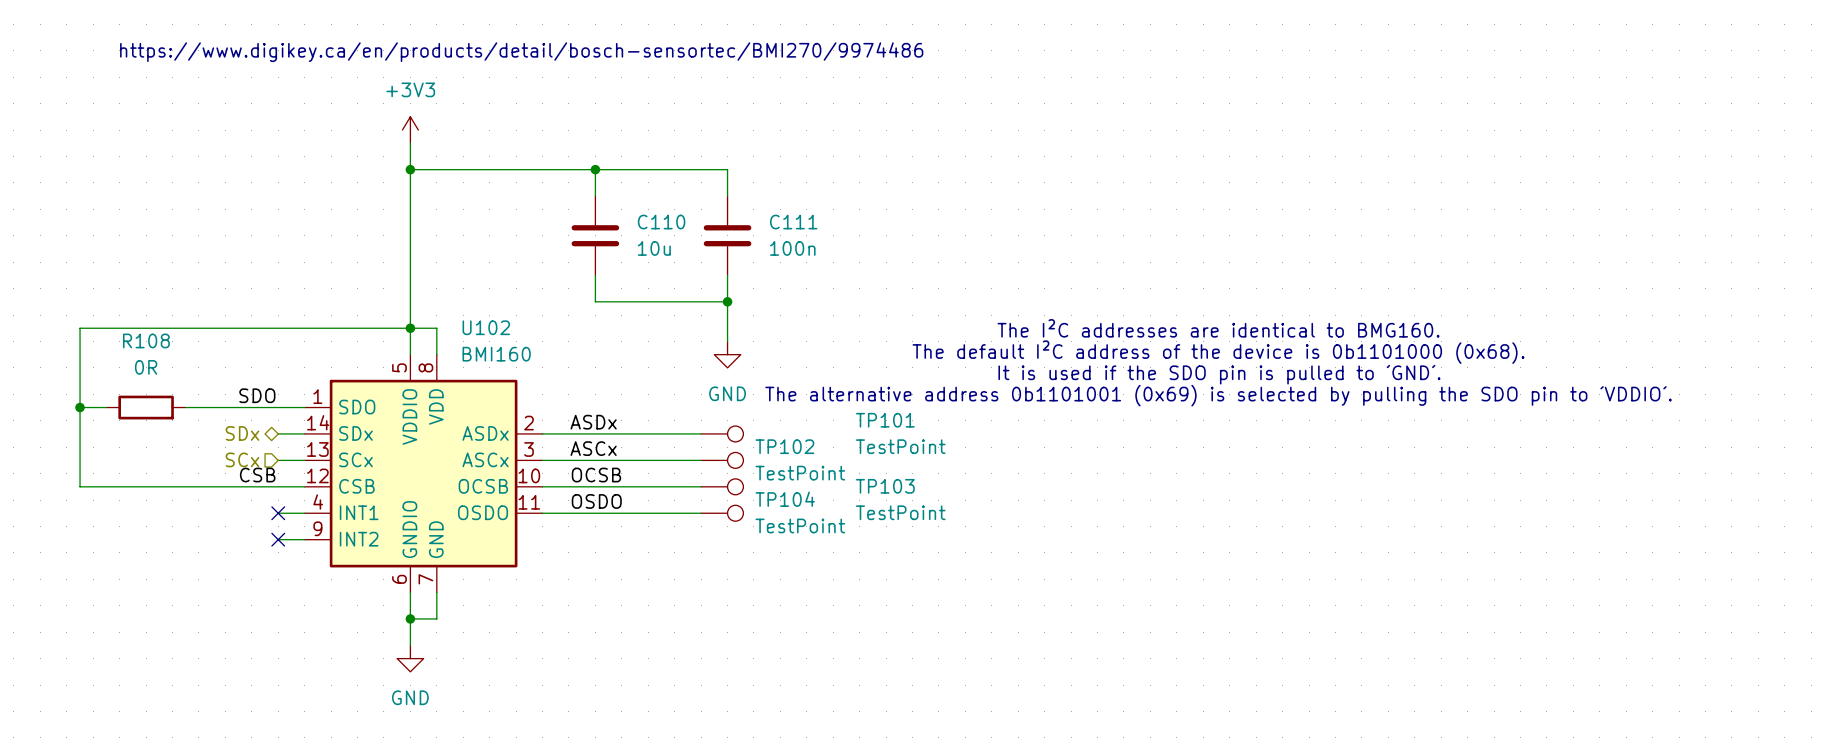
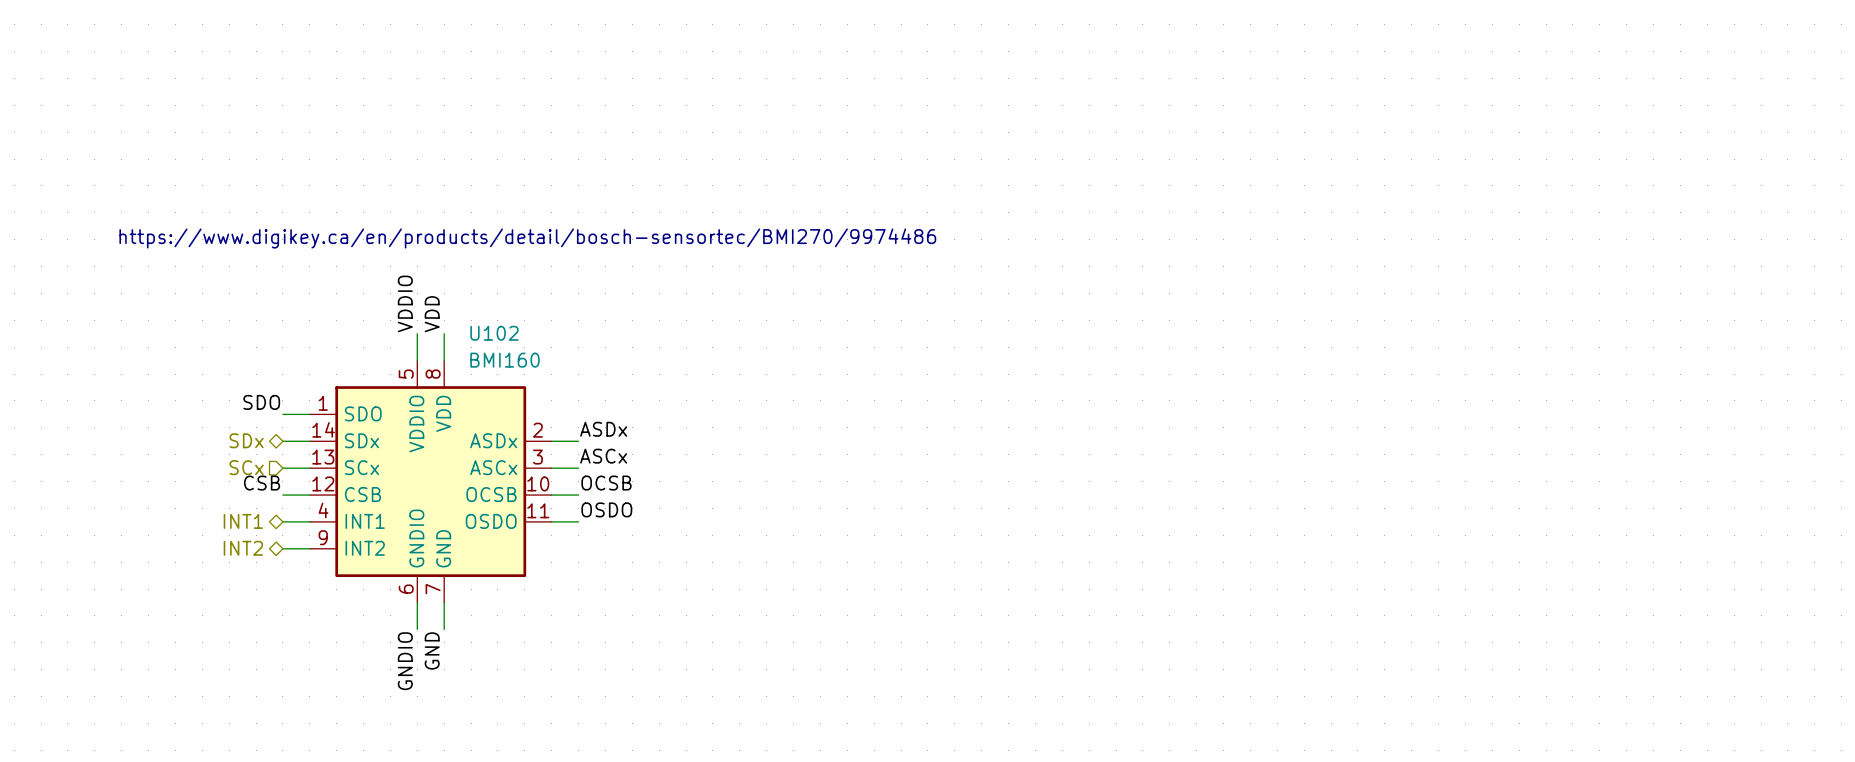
text position: https://www.digikey.ca/en/products/detail/bosch-sensortec/BMI270/9974486 (521, 52) -> https://www.digikey.ca/en/products/detail/bosch-sensortec/BMI270/9974486 (527, 238)
power symbol: +3V3 (410, 130) -> none
wire: (410, 143) (410, 328) -> none
wire: (410, 169) (727, 169) (727, 196) -> none
junction: (410, 169) -> none
wire: (595, 169) (595, 196) -> none
junction: (595, 169) -> none
C110: 10u (595, 235) -> none
C111: 100n (727, 235) -> none
wire: (595, 275) (595, 301) (727, 301) -> none
wire: (727, 275) (727, 341) -> none
label: none -> VDDIO (405, 303)
junction: (727, 301) -> none
label: none -> VDD (432, 314)
junction: (410, 328) -> none
wire: (436, 328) (80, 328) (80, 486) (278, 486) -> none
text: The I²C addresses are identical to BMG160. (1218, 328) -> none
text: The default I²C address of the device is 0b1101000 (0x68). (1218, 352) -> none
power symbol: GND (727, 354) -> none
text: It is used if the SDO pin is pulled to ´GND´. (1219, 374) -> none
text: The alternative address 0b1101001 (0x69) is selected by pulling the SDO pin to ´VDDIO´. (1218, 395) -> none
wire: (80, 407) (106, 407) -> none
junction: (80, 407) -> none
R108: 0R (146, 407) -> none
wire: (185, 407) (278, 407) -> none
wire: (568, 433) (701, 433) -> none
TP101: TestPoint (722, 433) -> none
wire: (568, 460) (701, 460) -> none
TP102: TestPoint (722, 460) -> none
wire: (568, 486) (701, 486) -> none
TP103: TestPoint (722, 486) -> none
hierarchical label: none -> INT1 (243, 521)
no-connect mark: (278, 513) -> none
wire: (568, 513) (701, 513) -> none
TP104: TestPoint (722, 513) -> none
hierarchical label: none -> INT2 (243, 548)
no-connect mark: (278, 539) -> none
junction: (410, 618) -> none
wire: (436, 618) (410, 618) (410, 645) -> none
label: none -> GND (432, 650)
label: none -> GNDIO (405, 661)
power symbol: GND (410, 658) -> none

